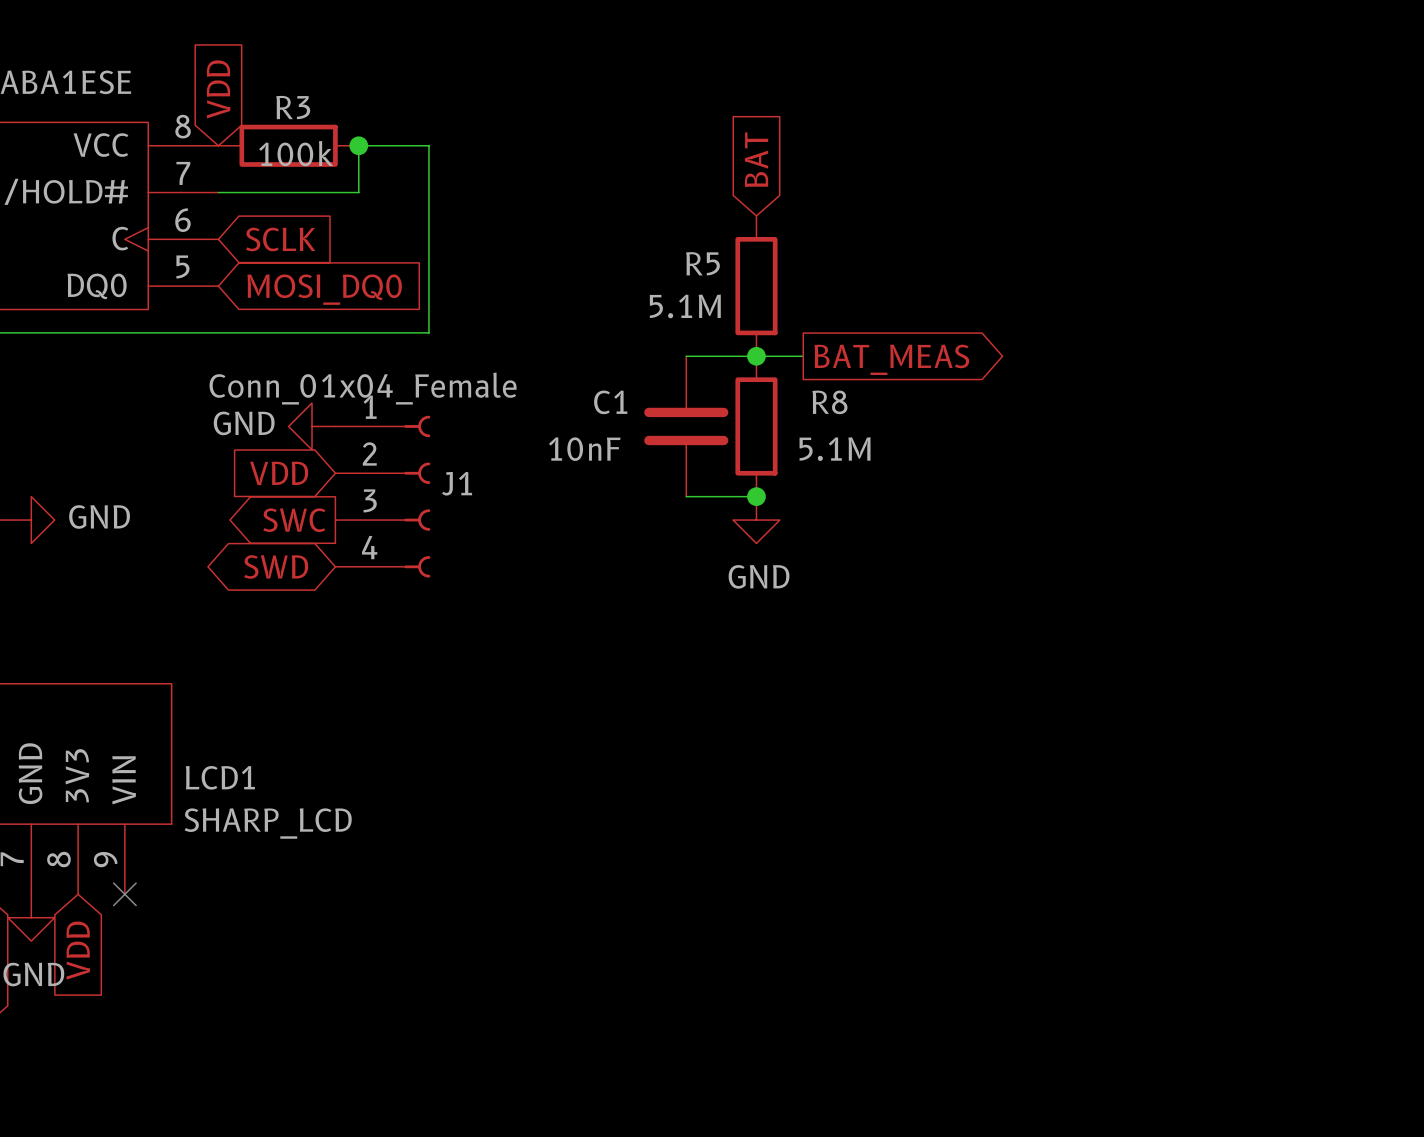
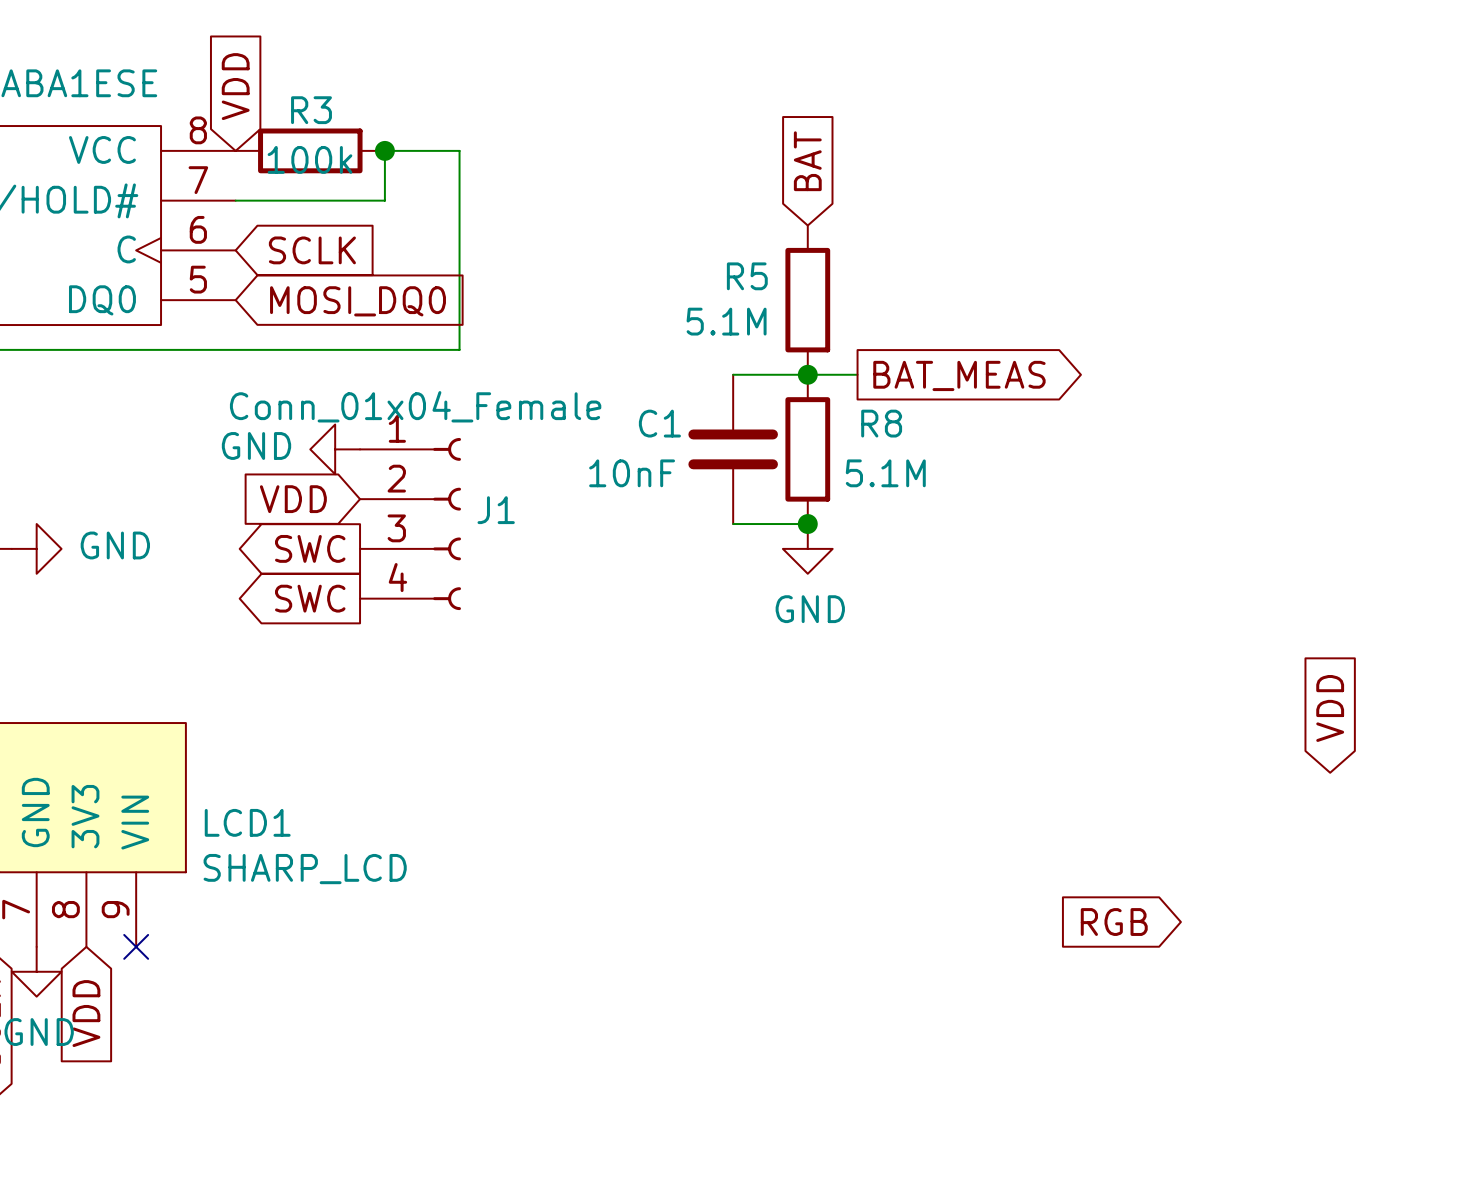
global label shape: bidirectional (276, 566) -> output (310, 598)
global label: SWD (276, 566) -> SWC (310, 598)
global label: none -> VDD (1330, 708)
global label: none -> RGB (1114, 922)

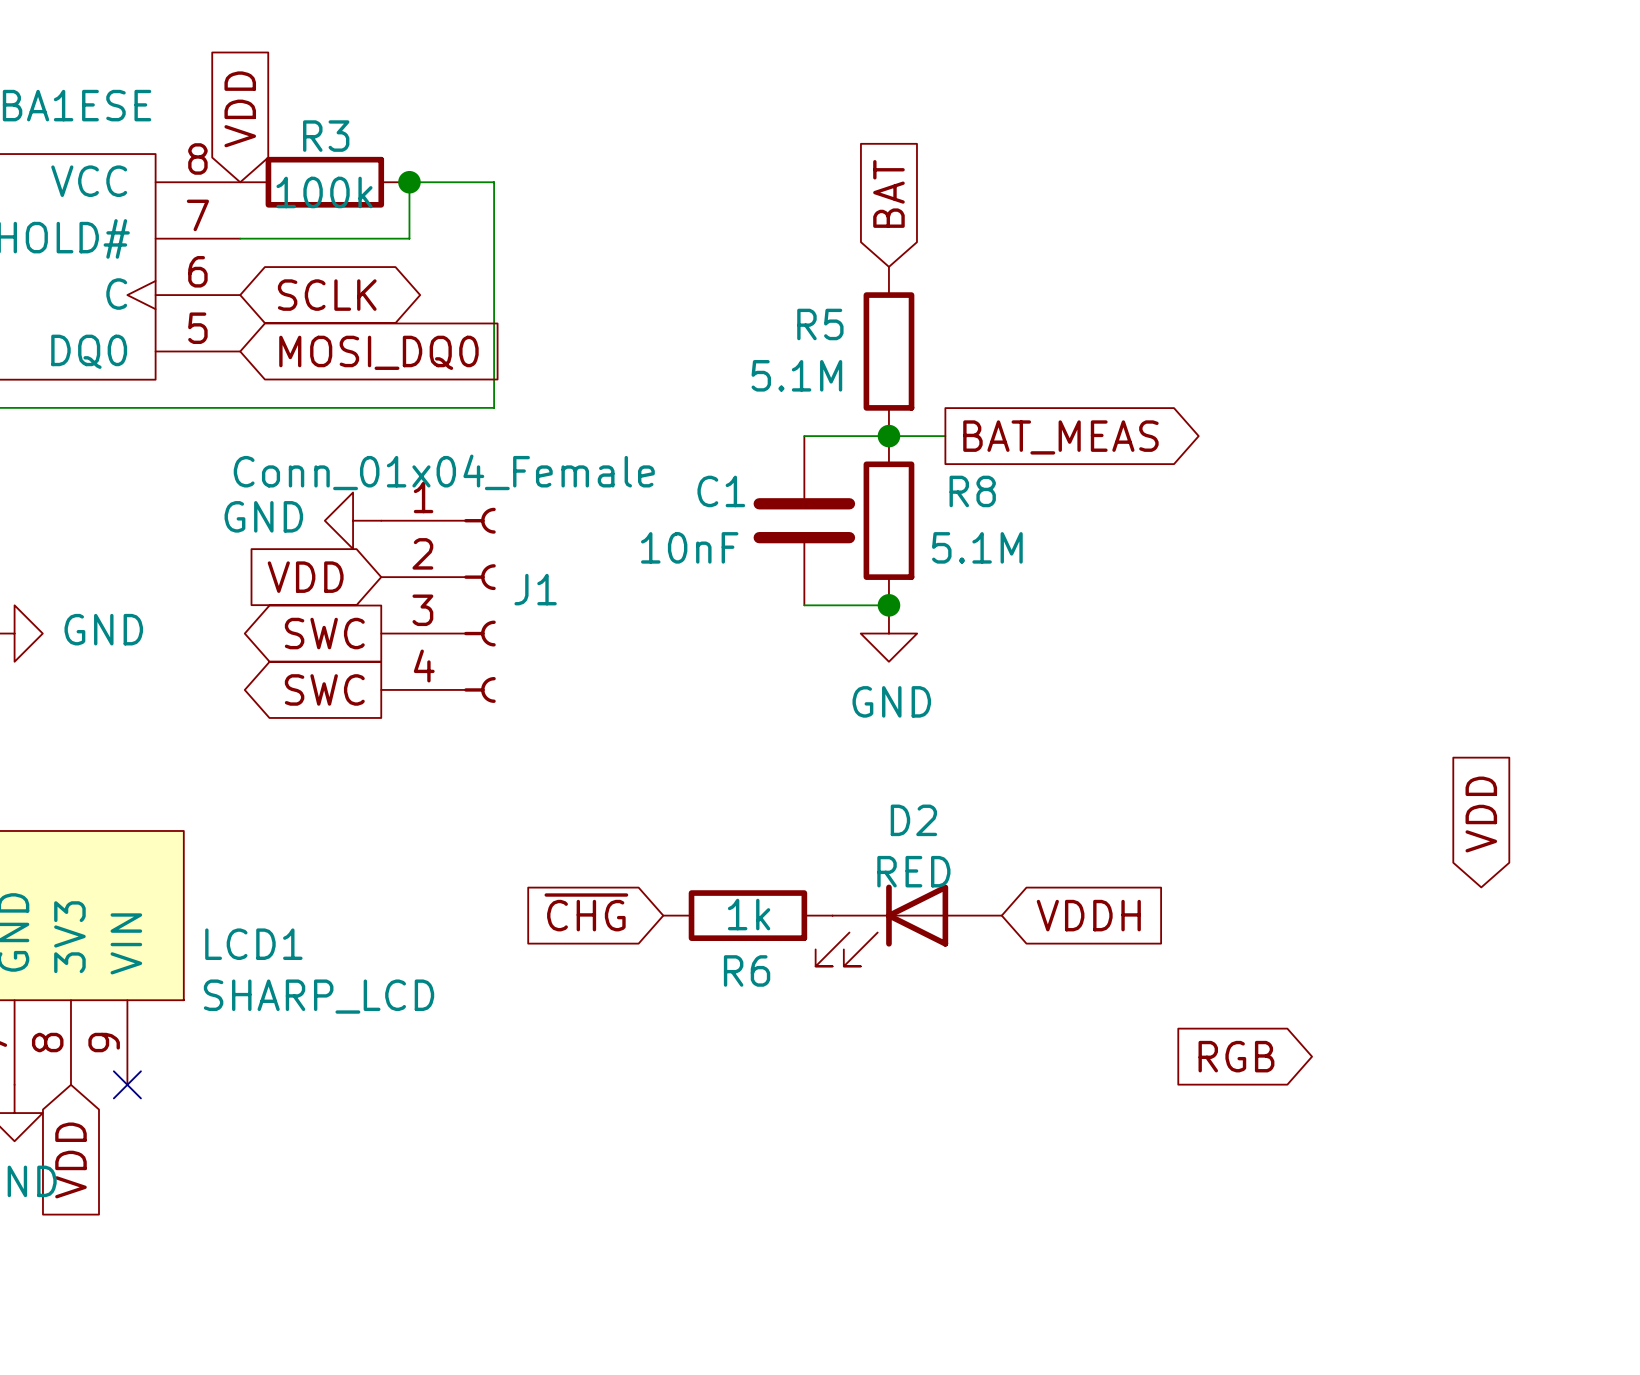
global label shape: input (312, 250) -> bidirectional (327, 295)
global label: none -> ~{CHG} (586, 912)
R6: none -> 1k (747, 915)
global label: none -> VDDH (1088, 915)
D2: none -> RED (908, 925)

